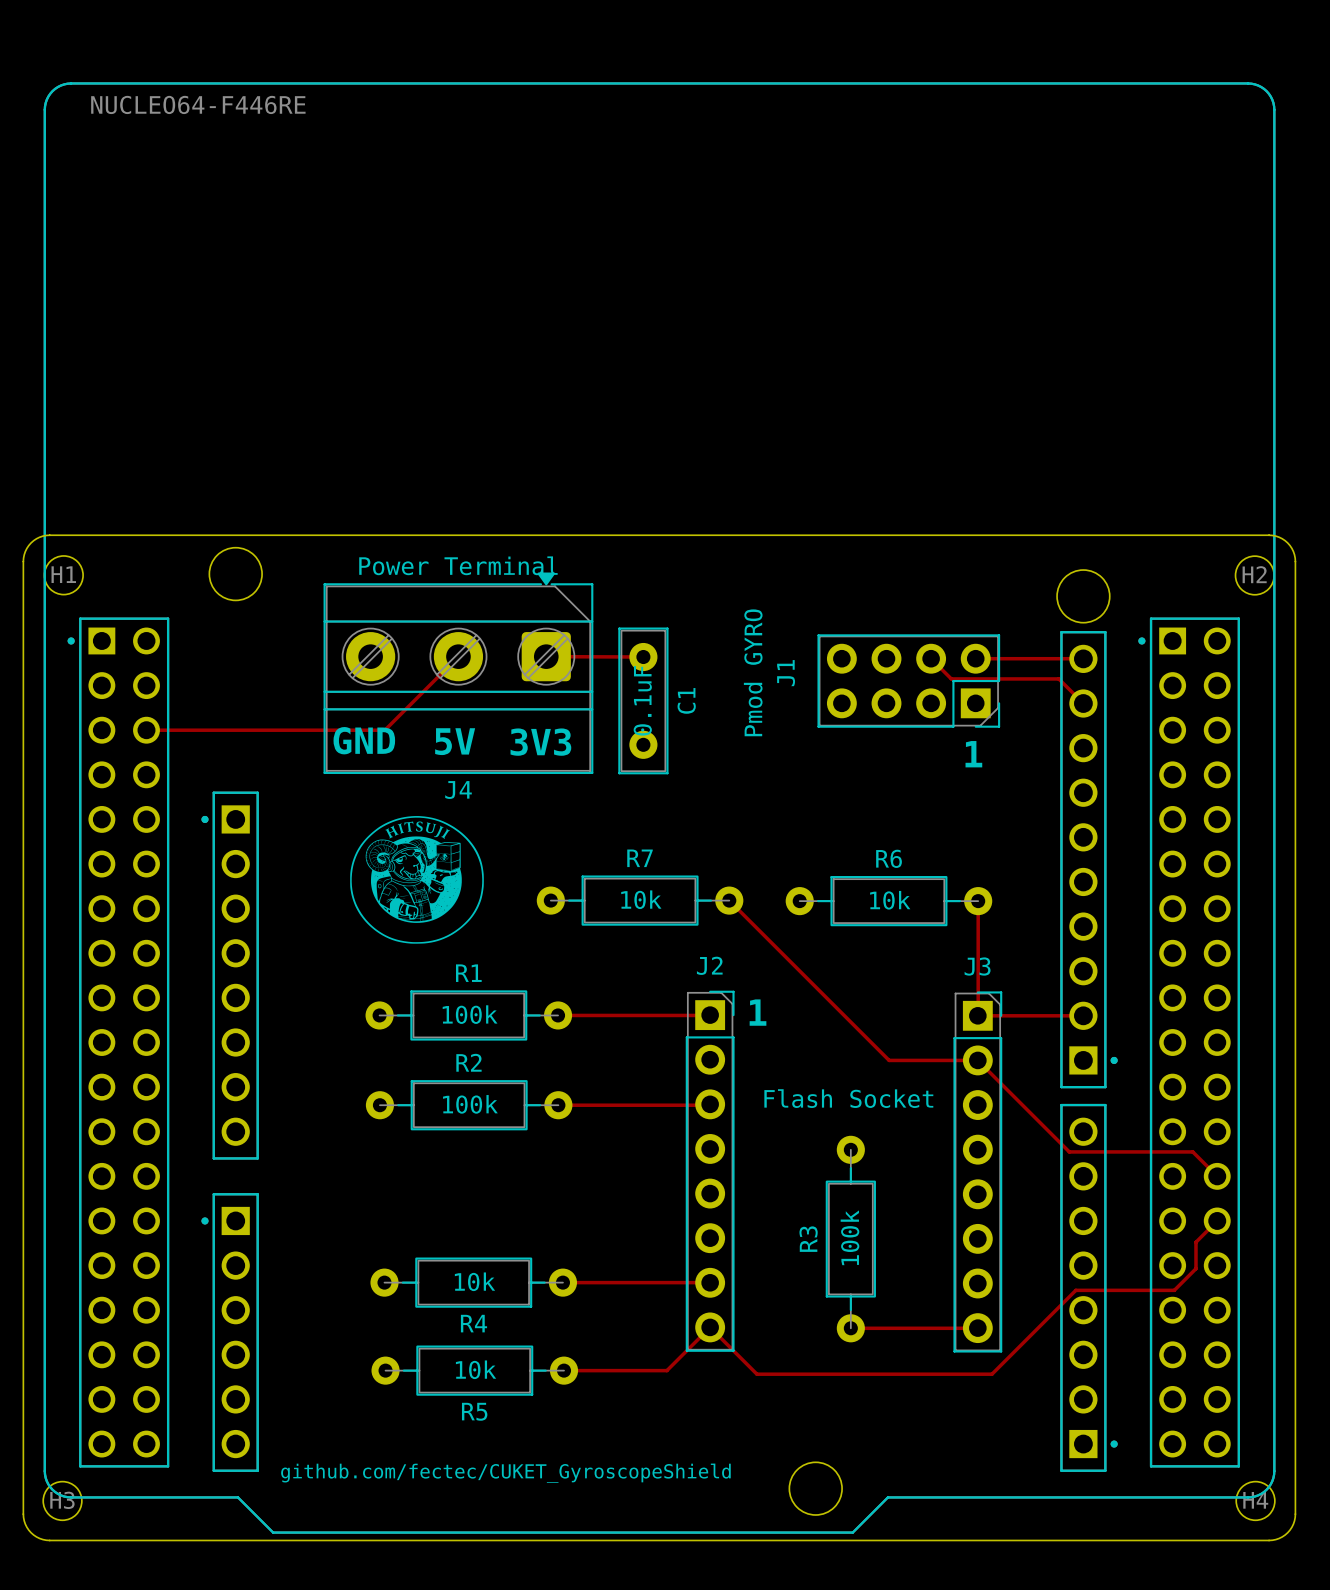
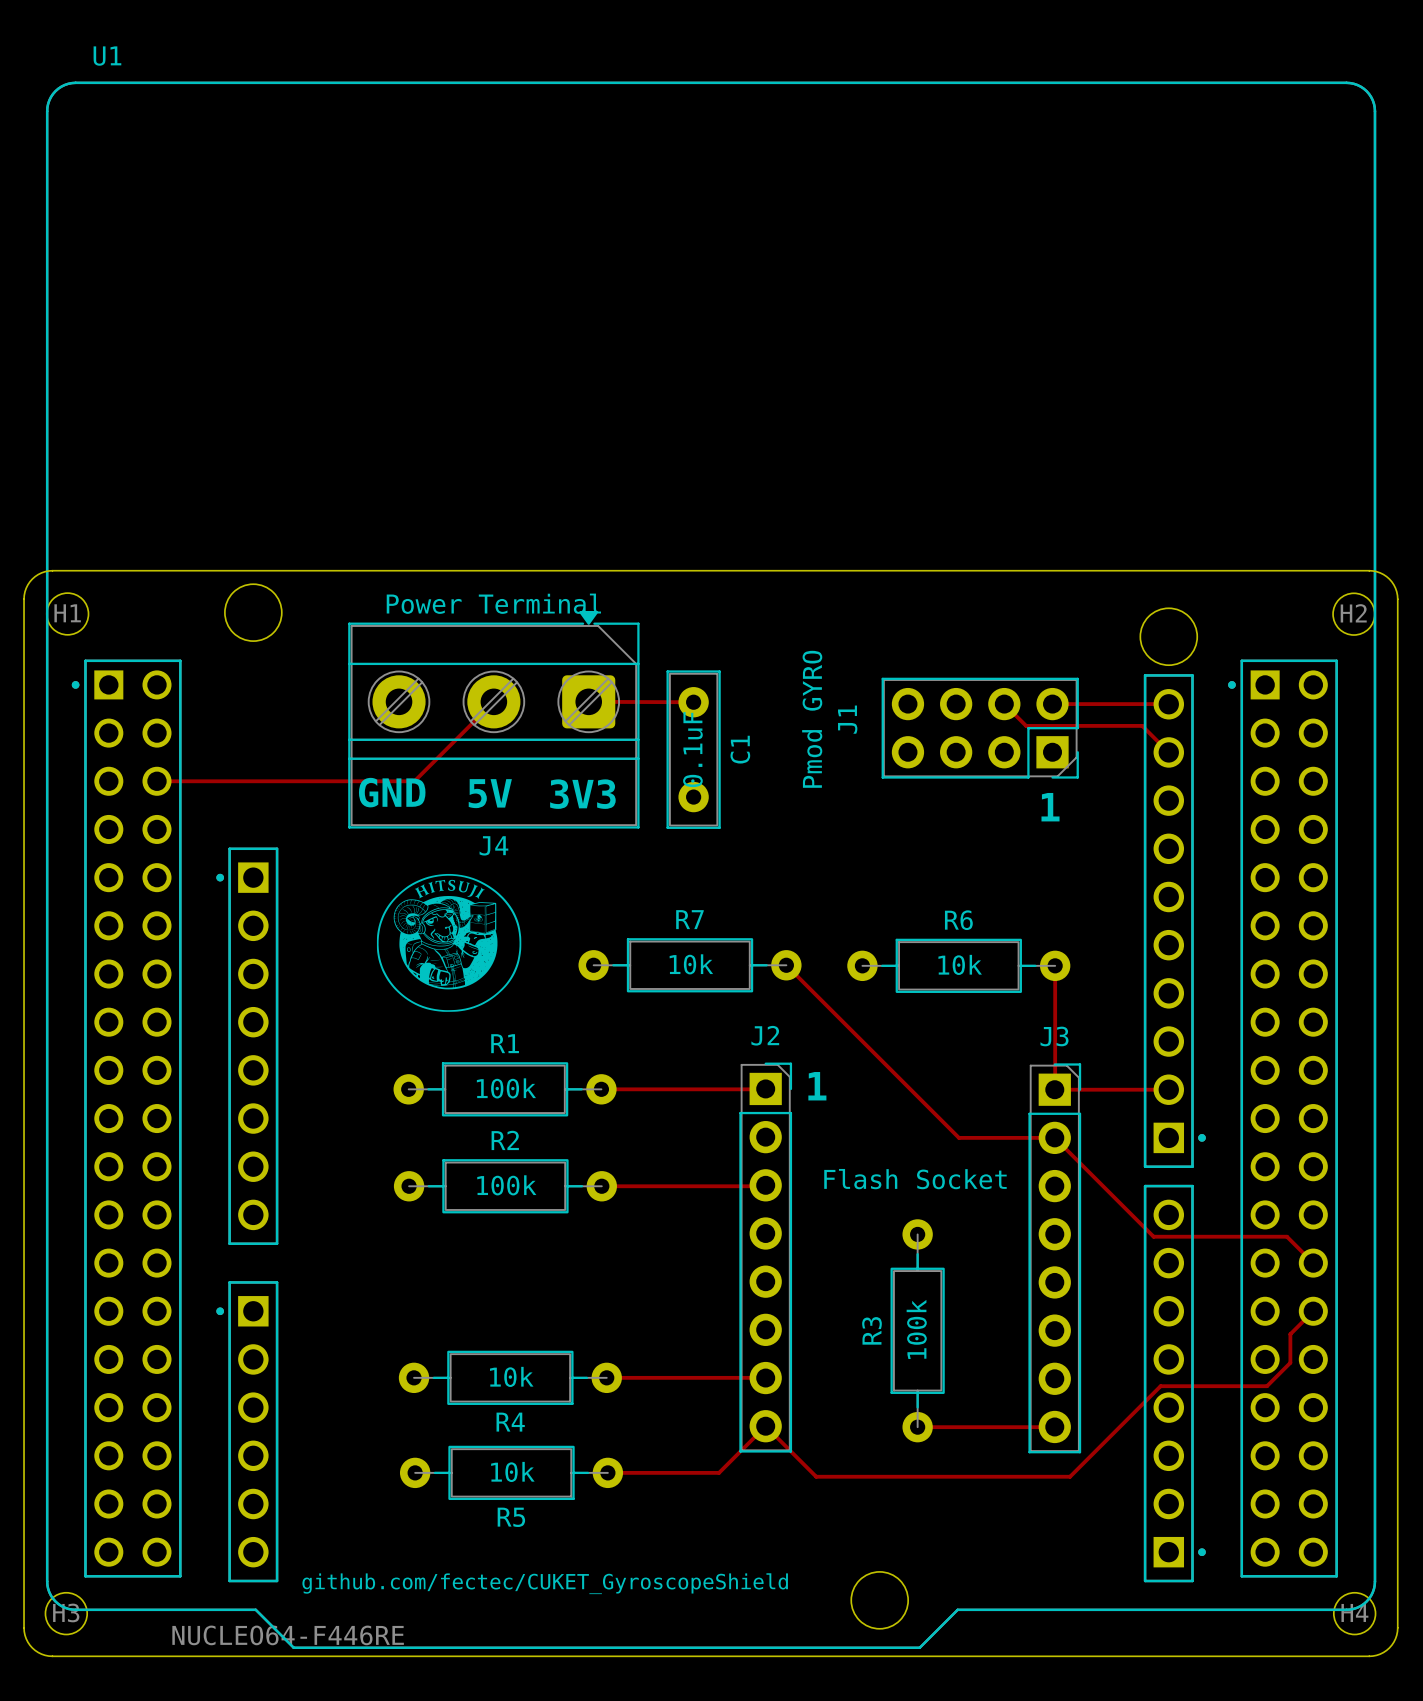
U1 name: none -> U1 (107, 56)
U1 value position: NUCLEO64-F446RE (198, 104) -> NUCLEO64-F446RE (288, 1635)

